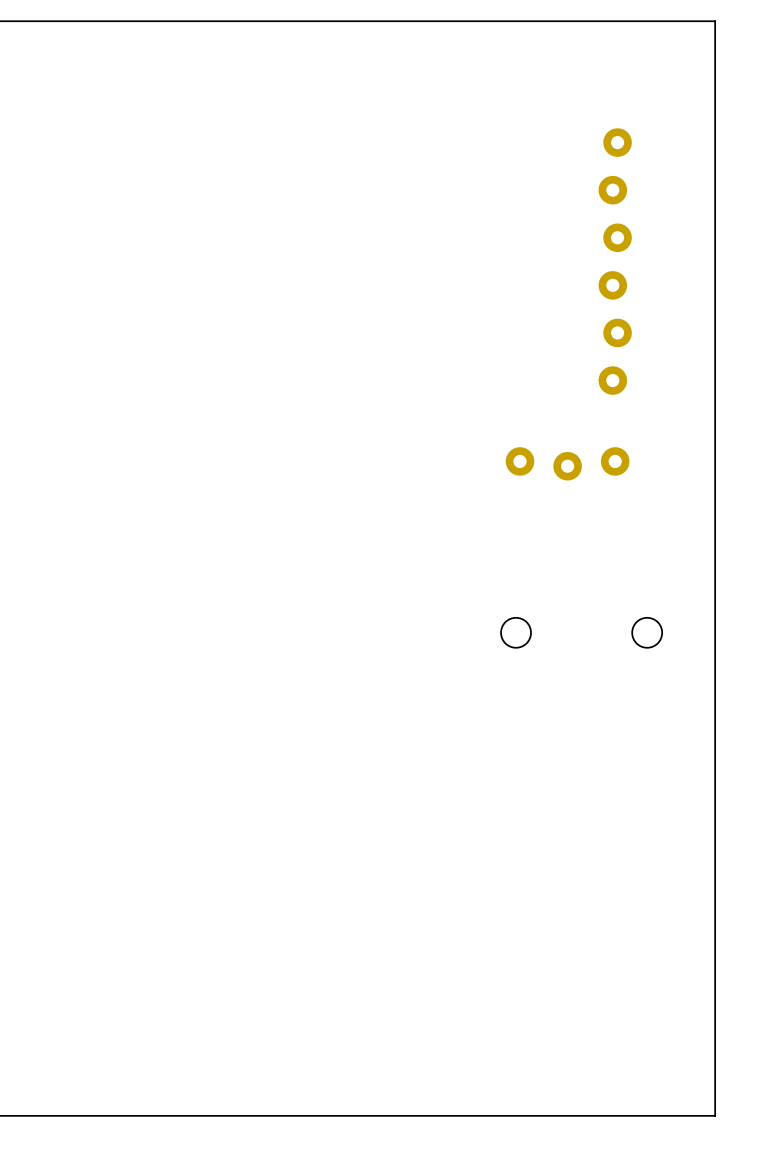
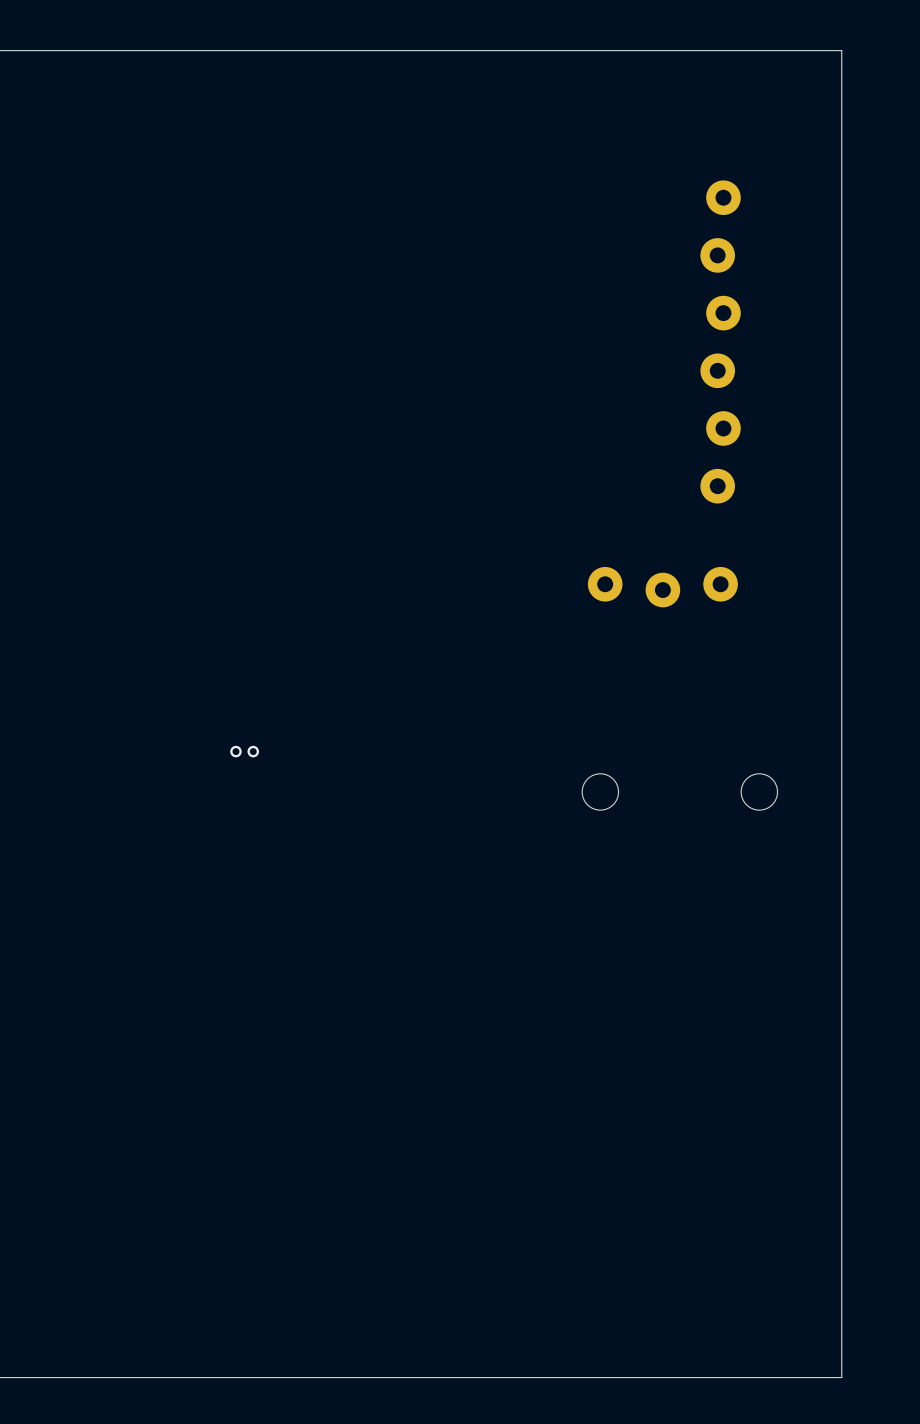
via: none -> (235, 751)
via: none -> (253, 751)

